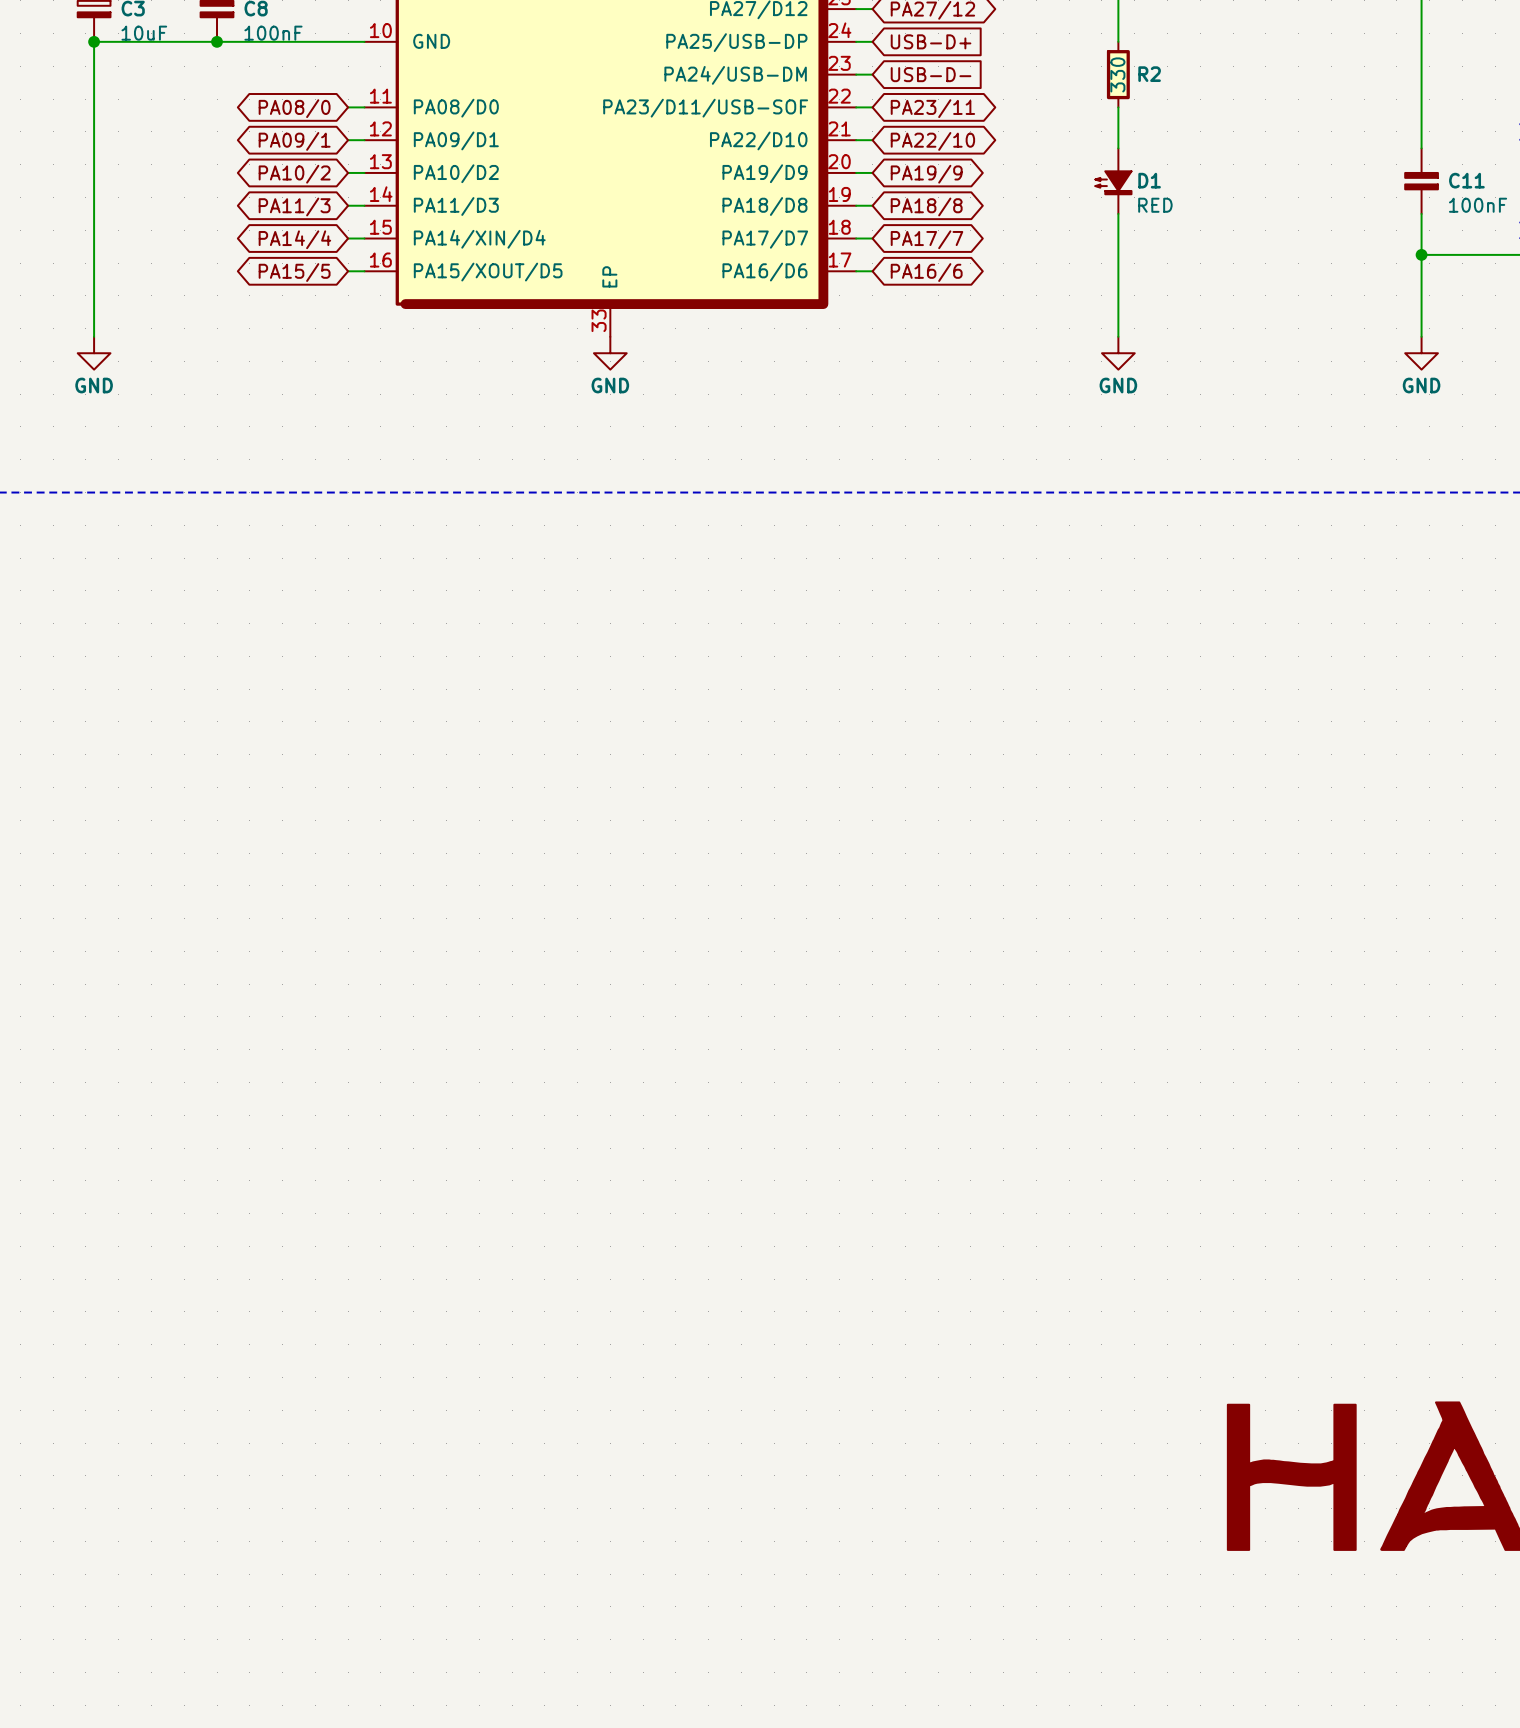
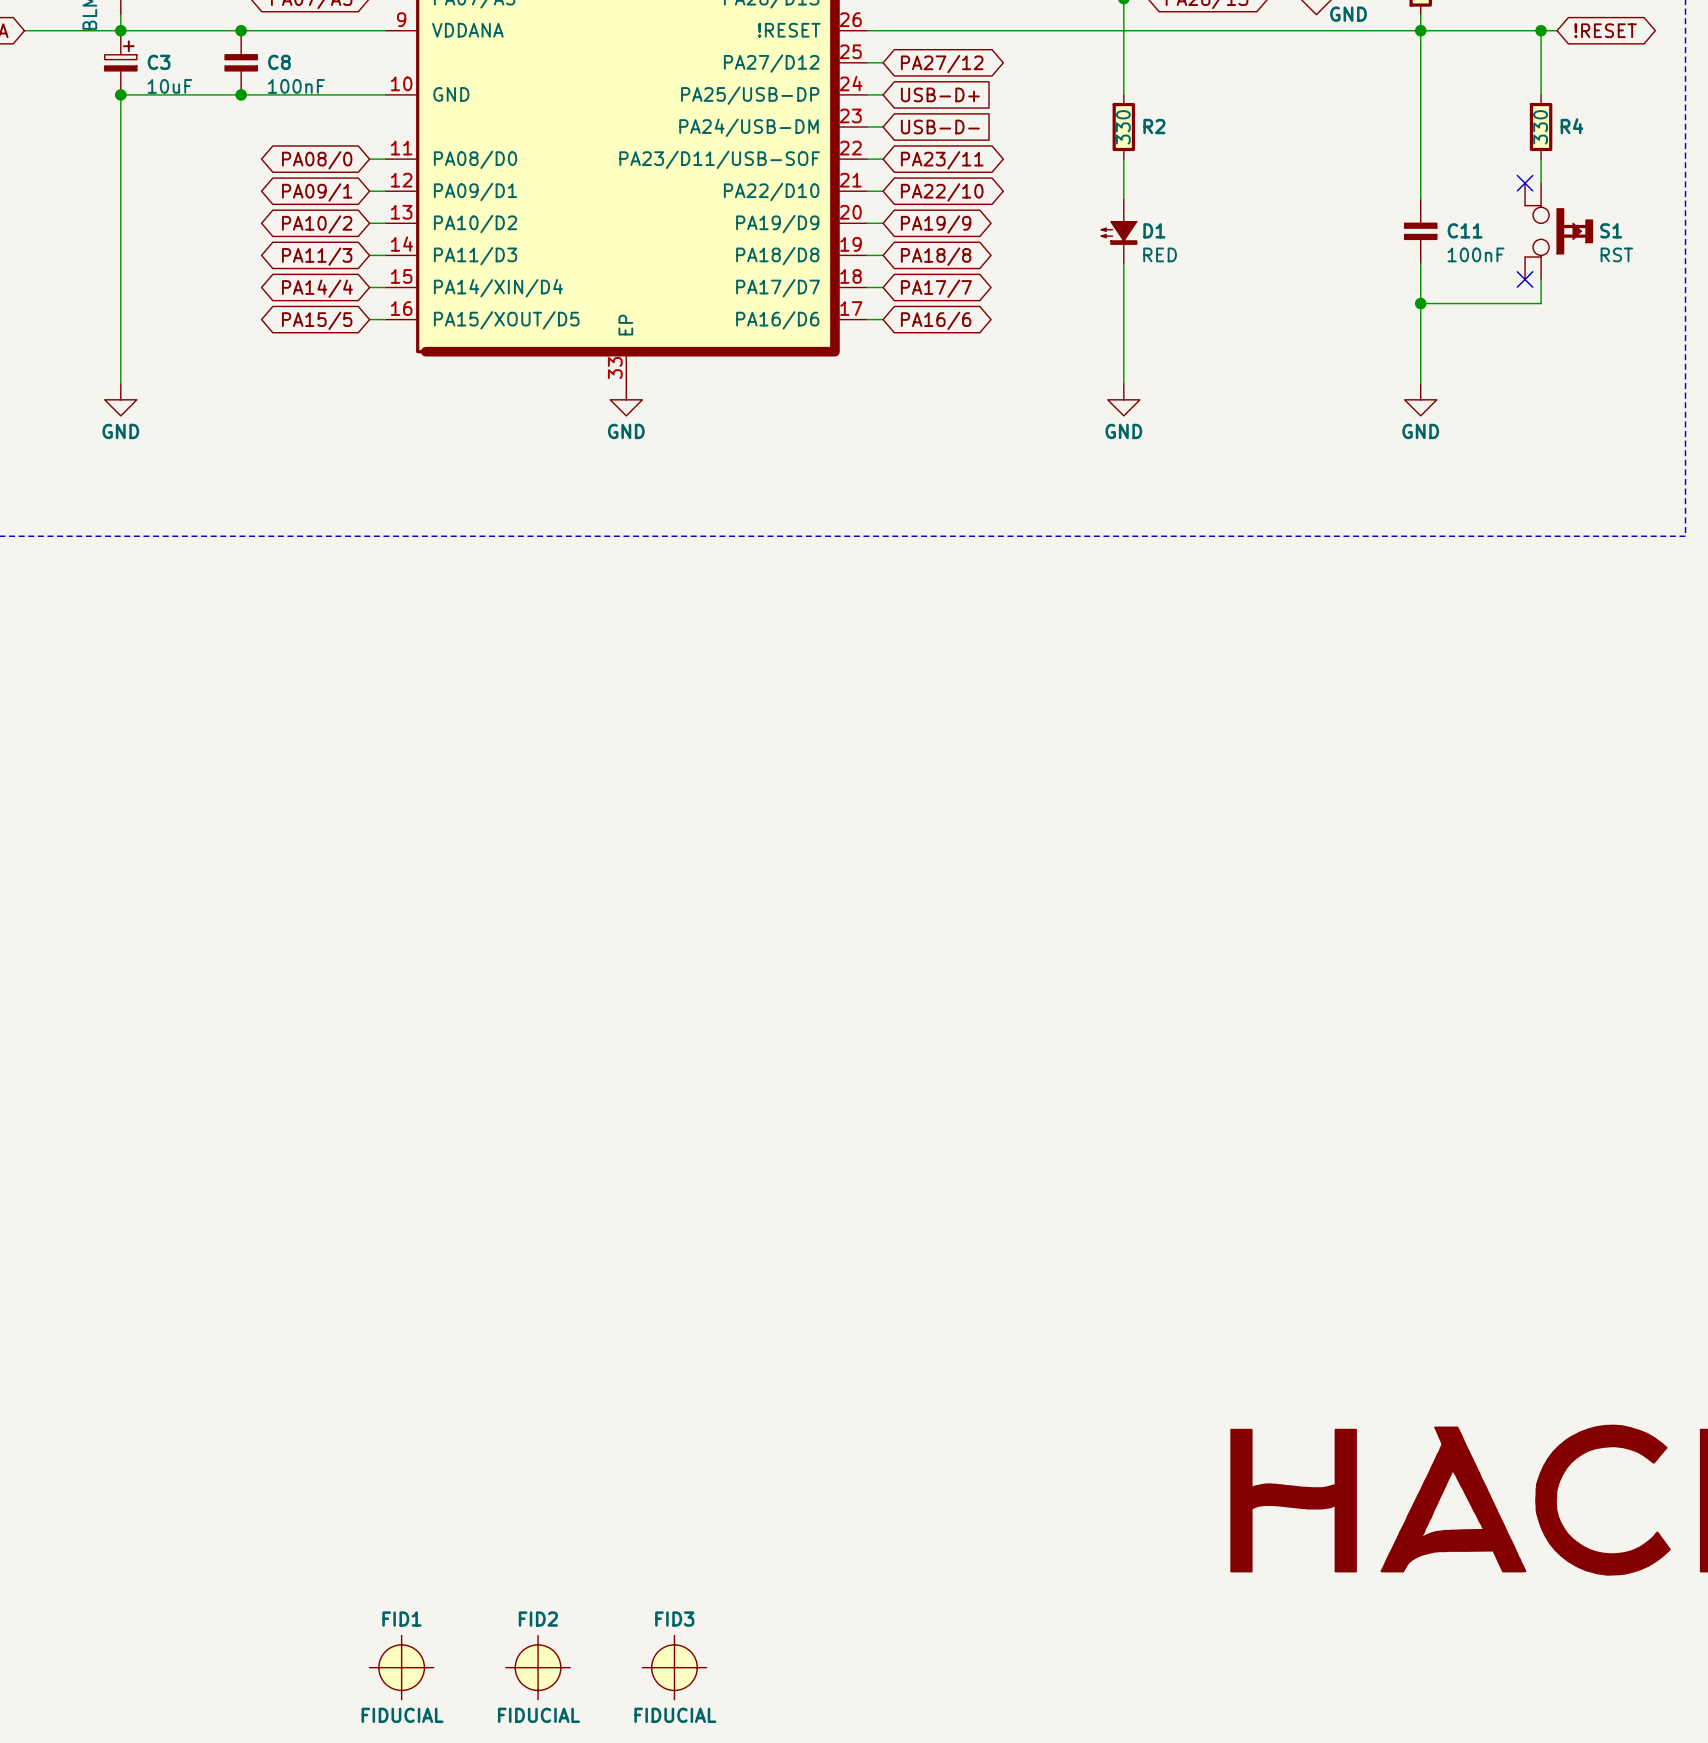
FID1: none -> FIDUCIAL (401, 1667)
FID2: none -> FIDUCIAL (538, 1667)
FID3: none -> FIDUCIAL (674, 1667)

